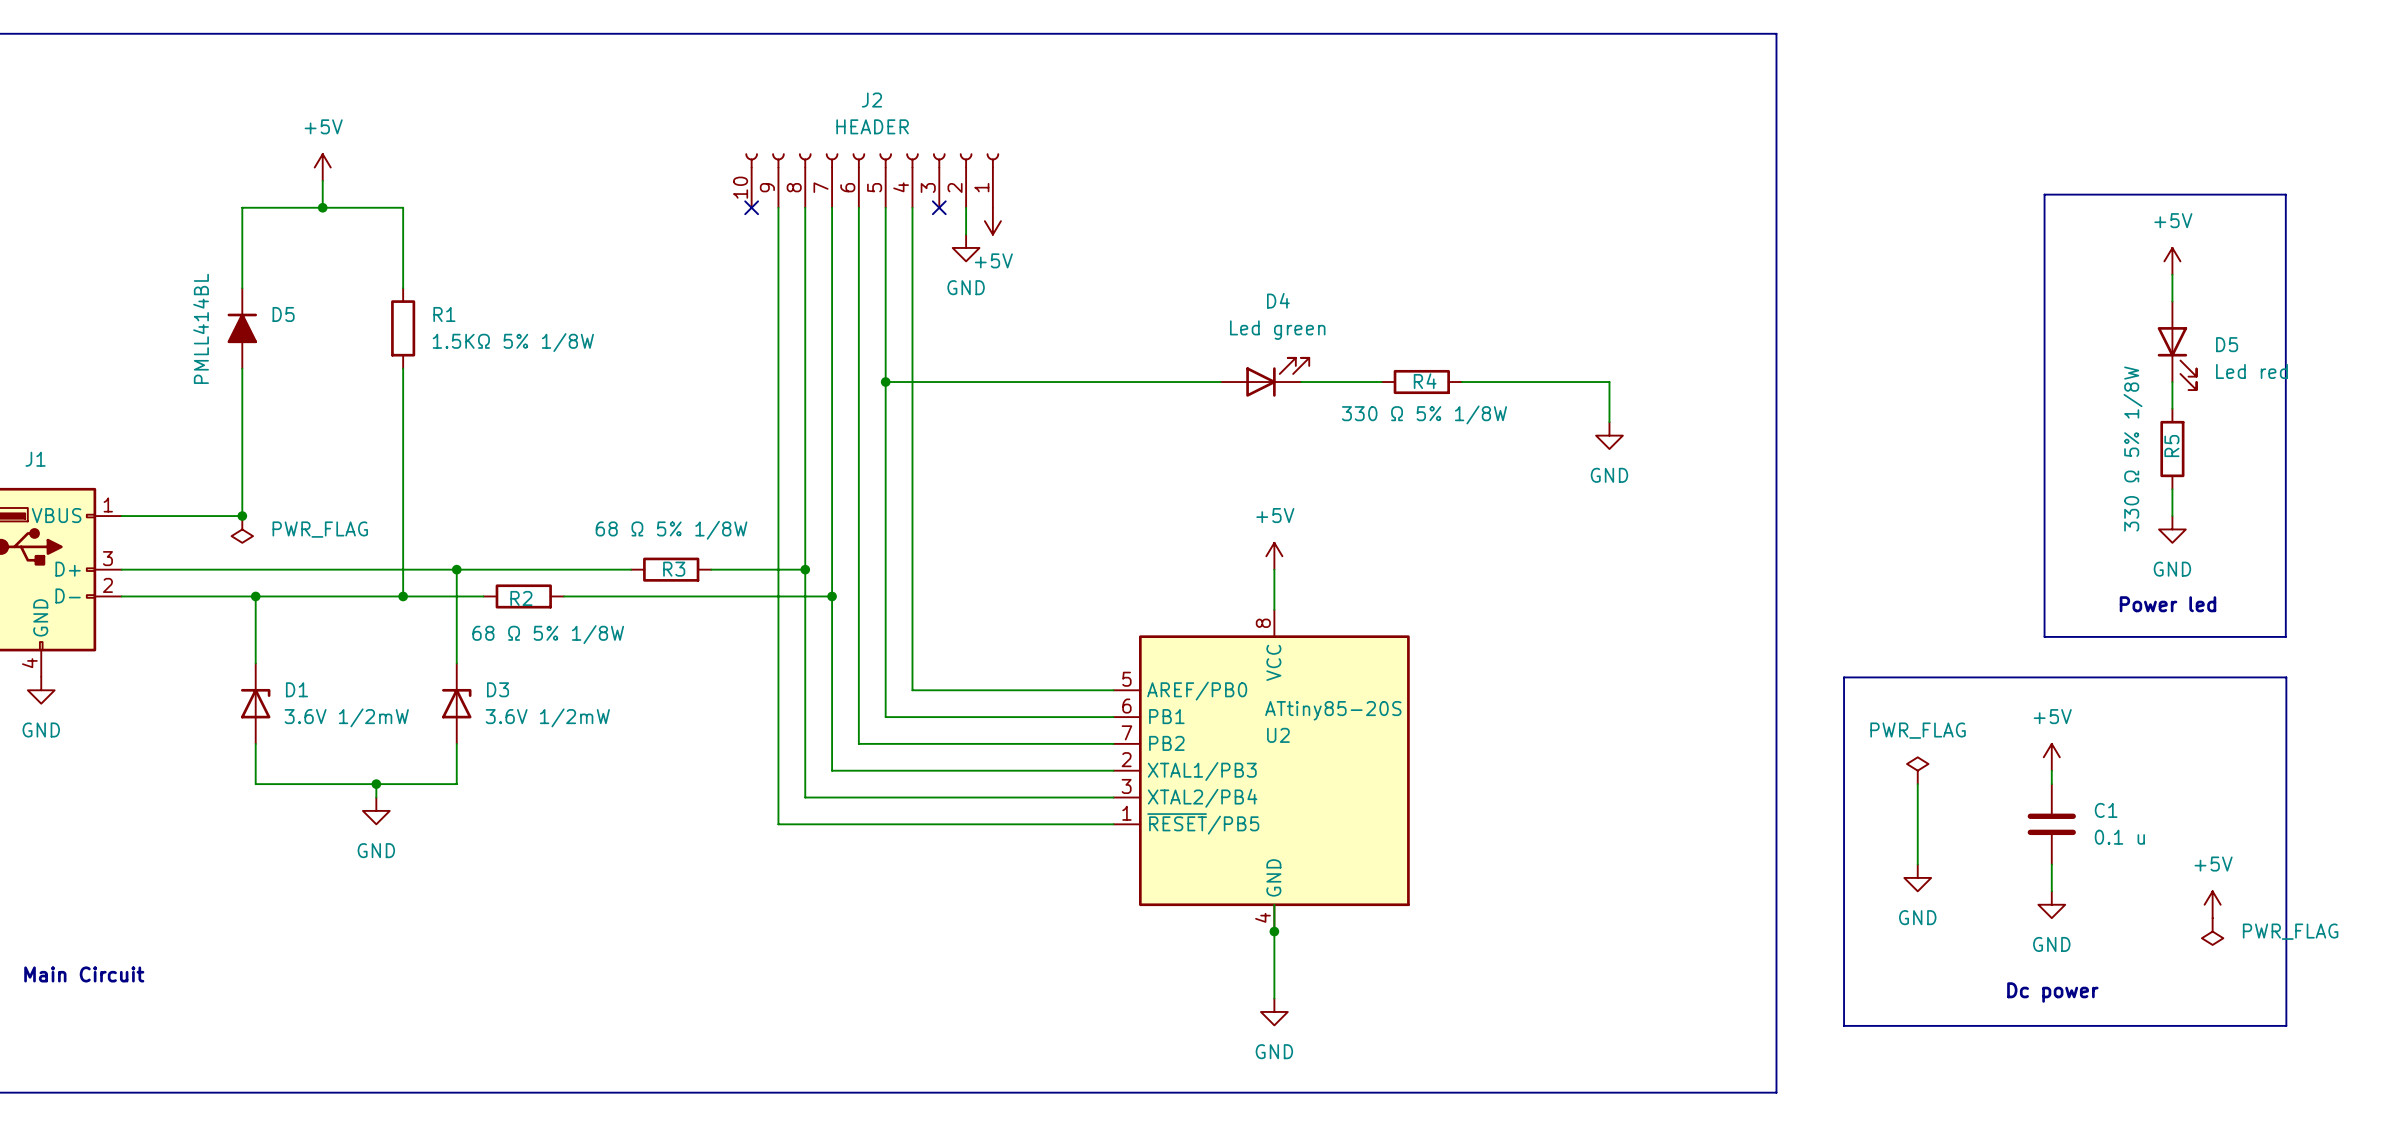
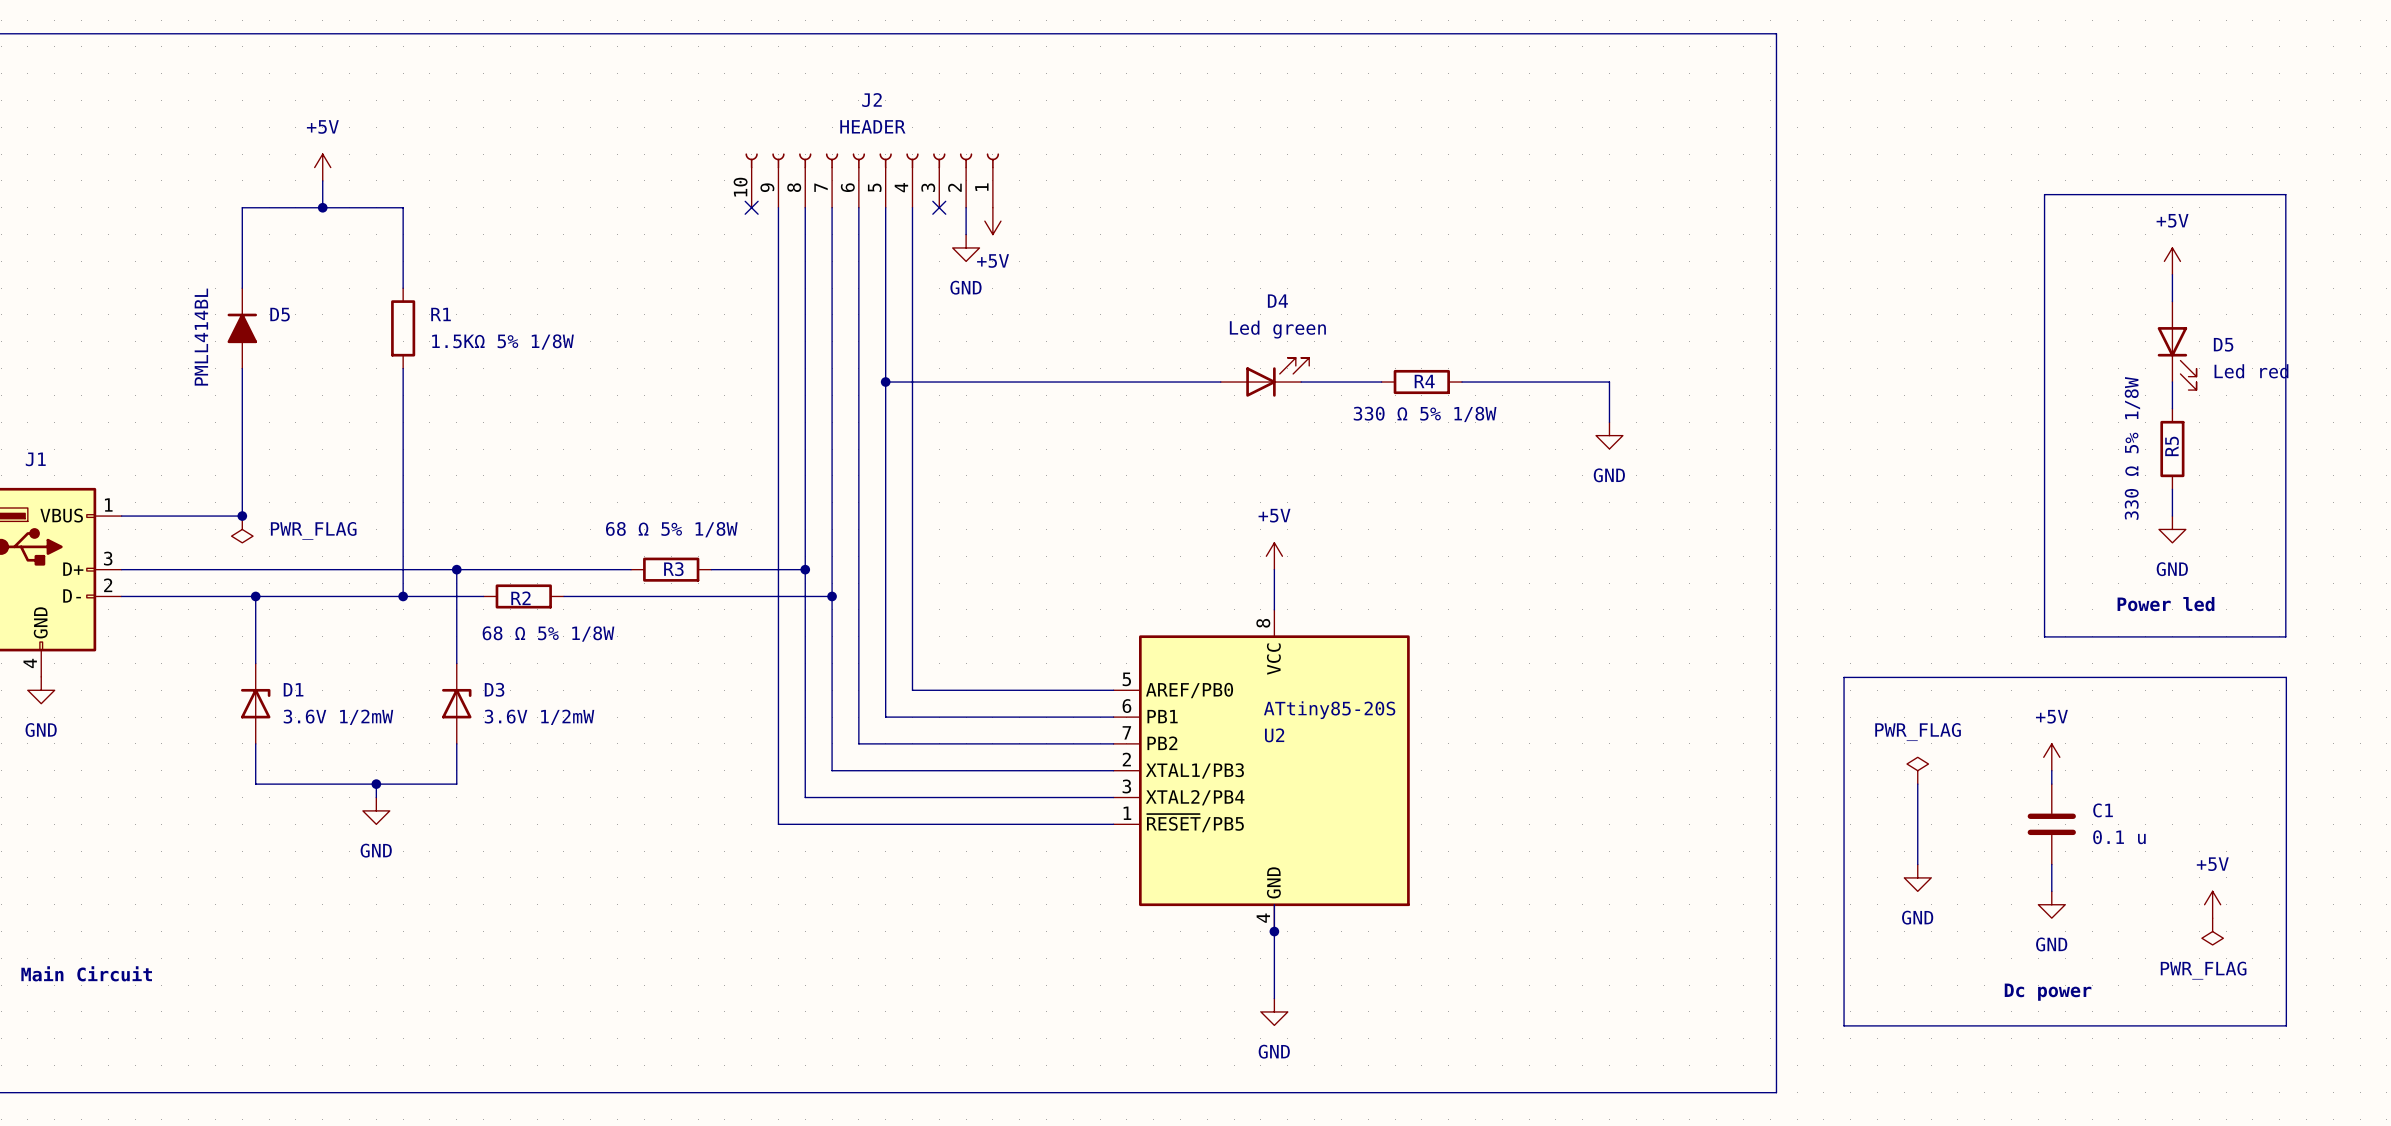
power symbol text position: PWR_FLAG (2290, 931) -> PWR_FLAG (2203, 970)

